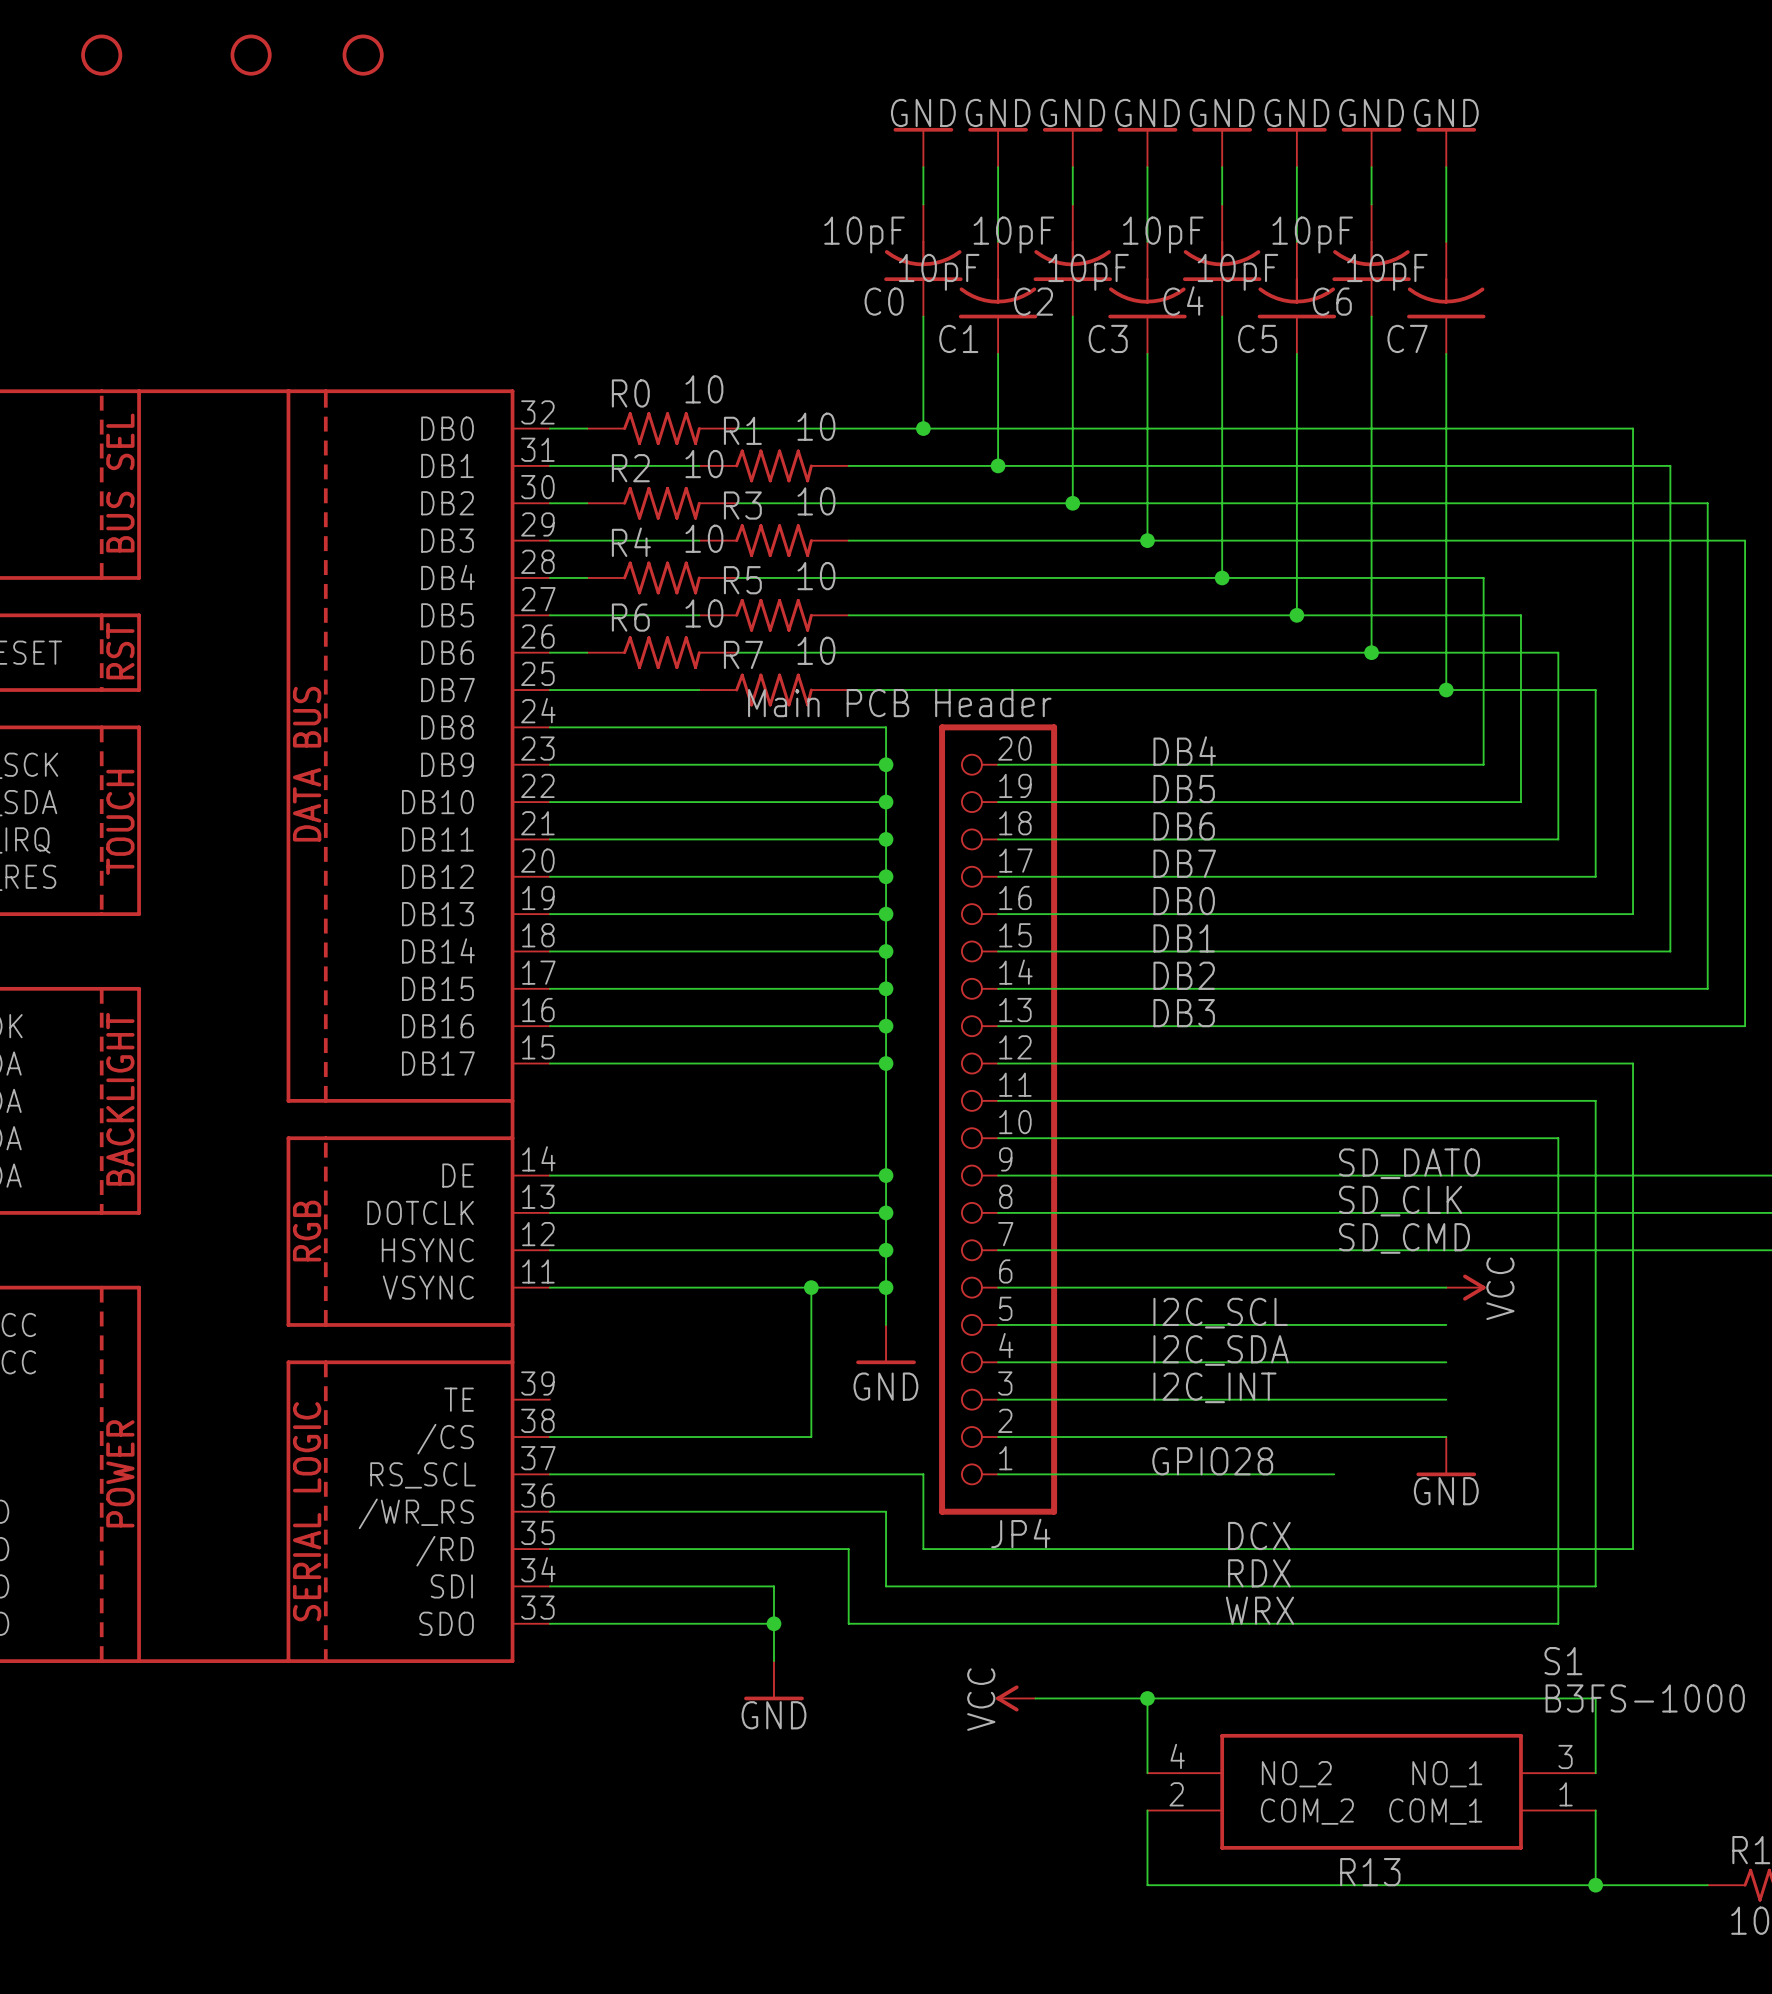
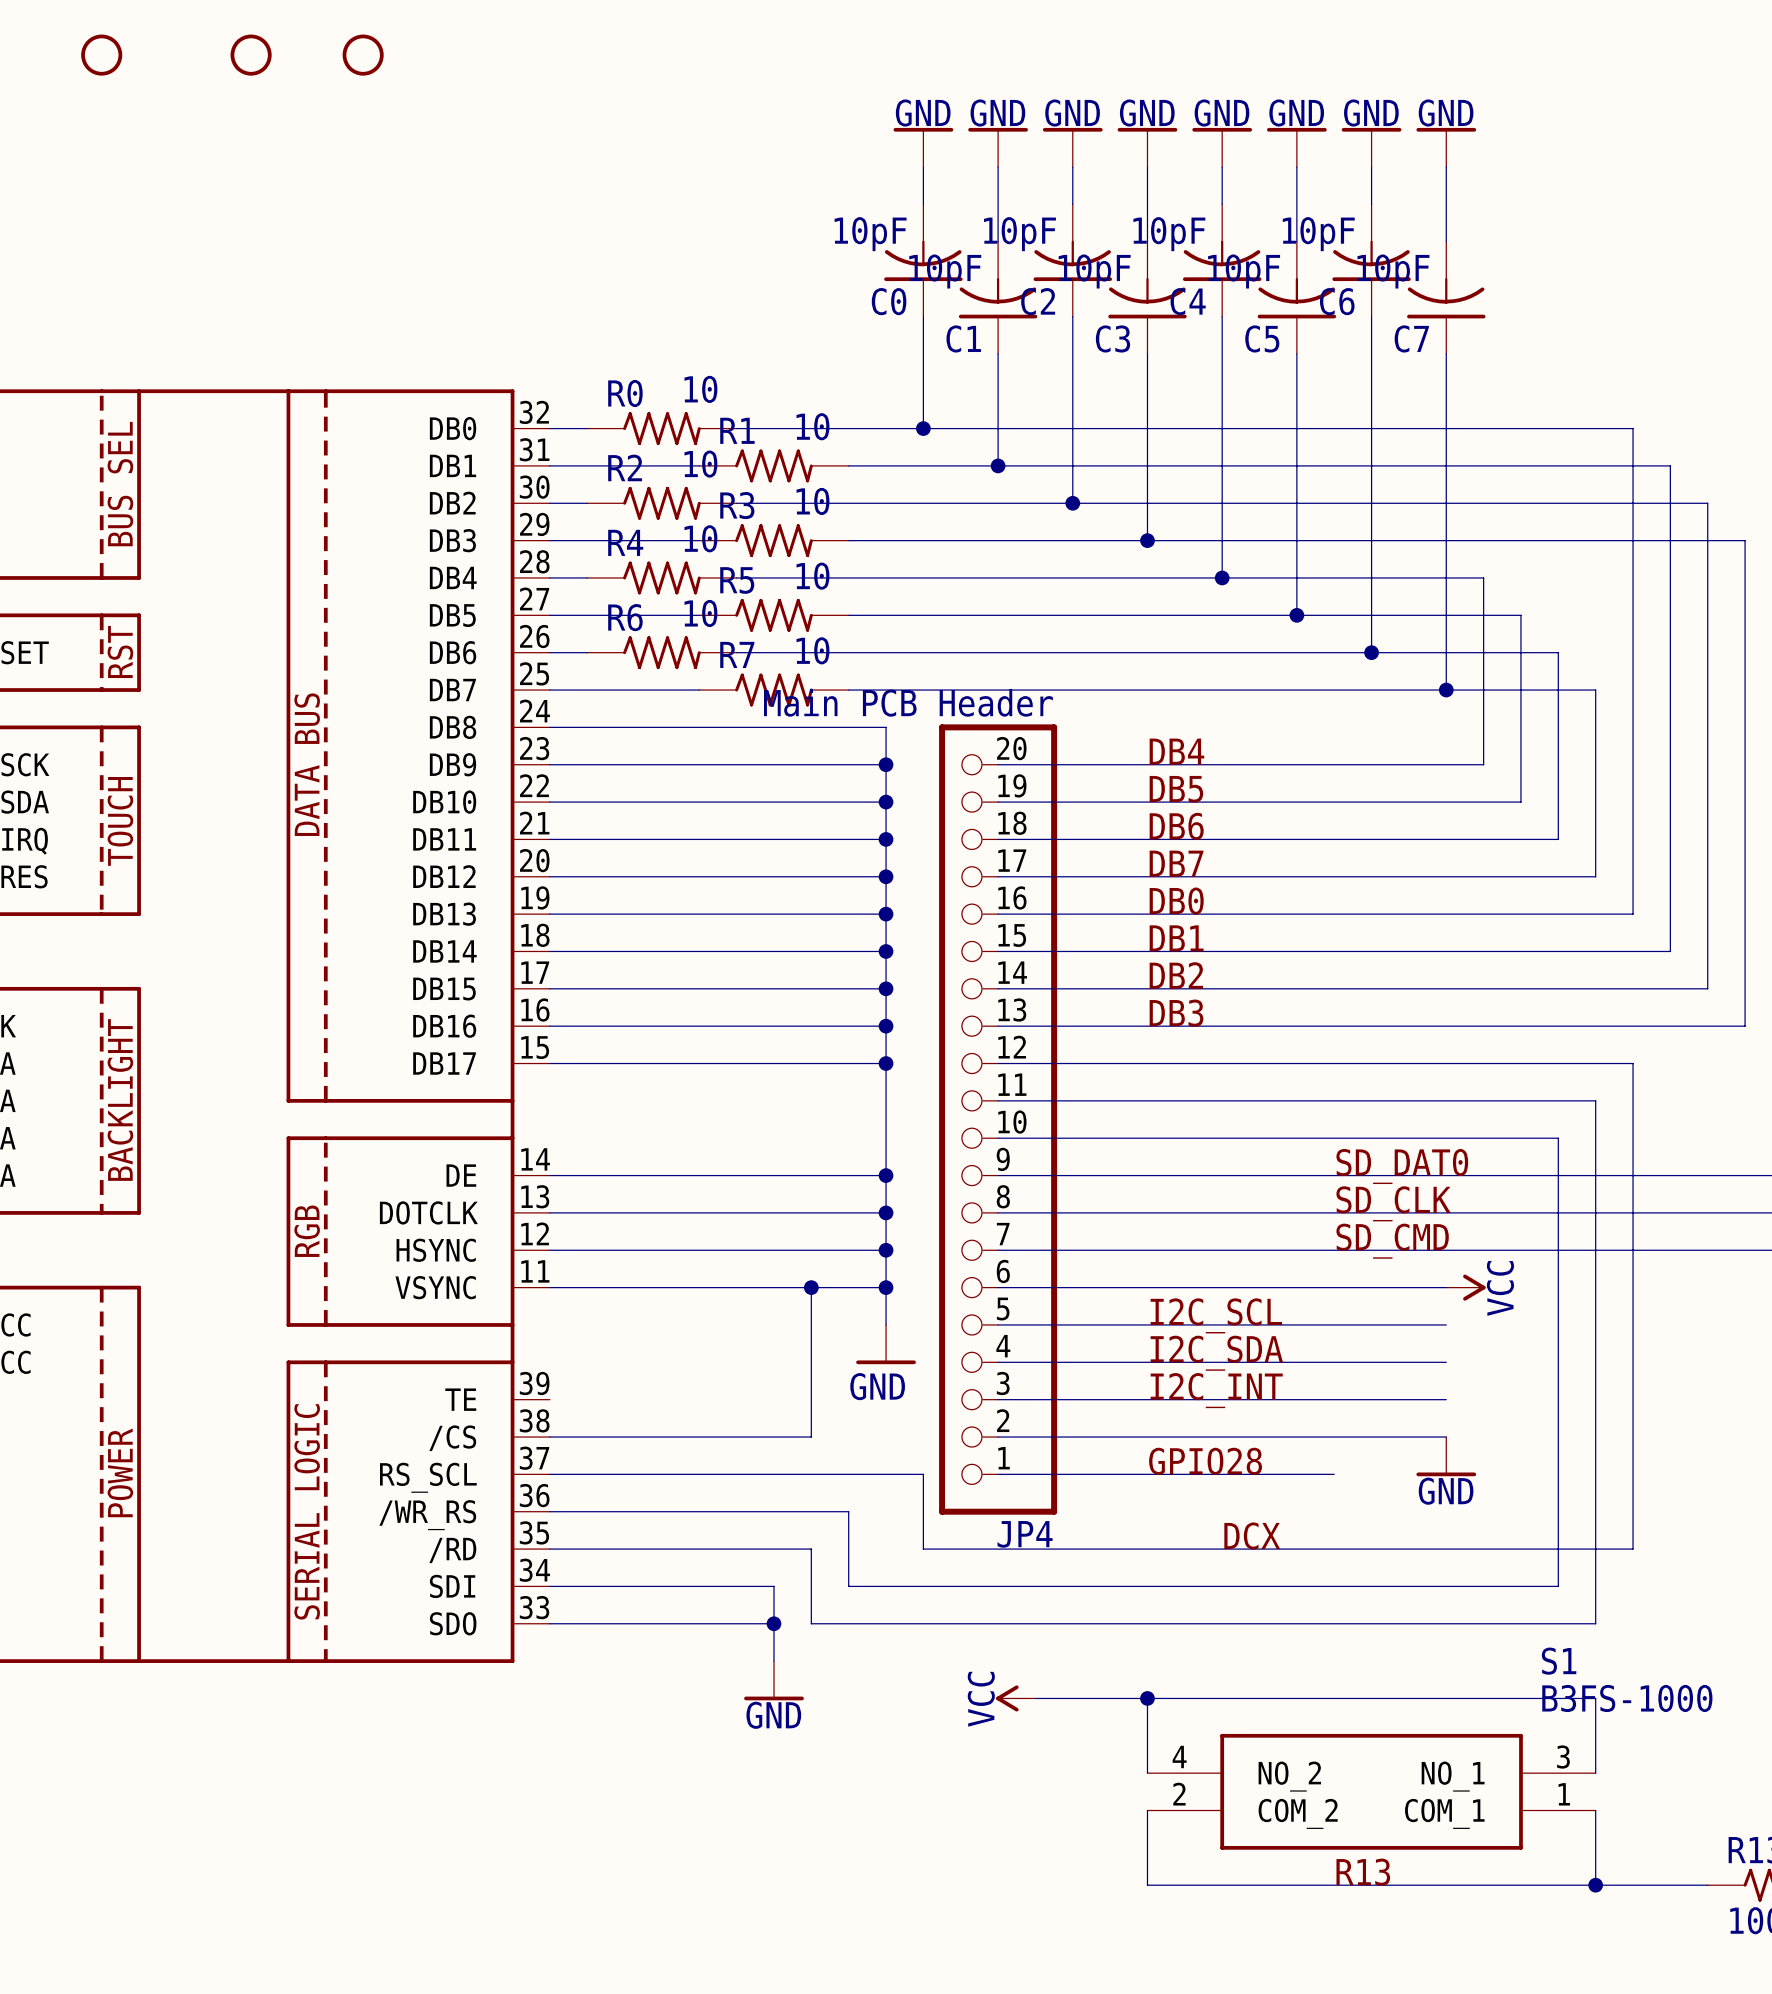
wire: (848, 1511) (886, 1511) (886, 1586) -> (848, 1511) (848, 1549)
wire: (811, 1549) (848, 1549) -> (811, 1549) (811, 1623) (848, 1623)
label: RDX (1259, 1573) -> none
wire: (848, 1586) (848, 1623) -> (848, 1586) (886, 1586)
wire: (1595, 1586) (1558, 1586) (1558, 1623) -> (1595, 1586) (1595, 1623) (1558, 1623)
label: WRX (1259, 1610) -> none

